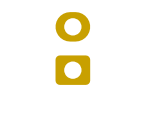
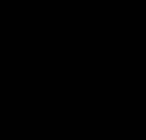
part: (72, 48) -> none

